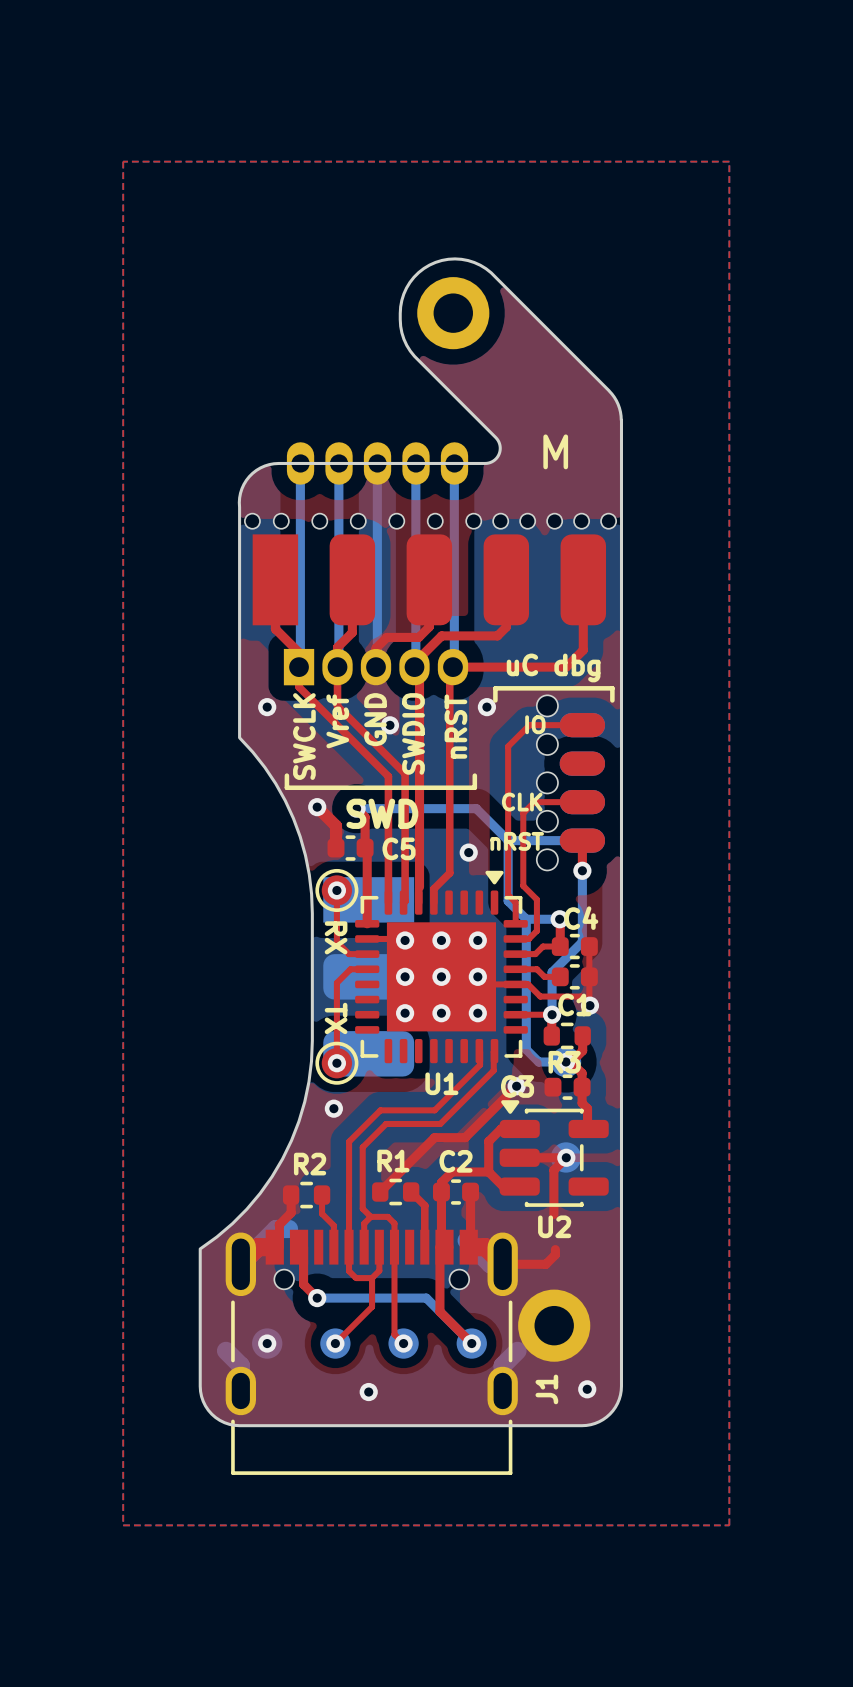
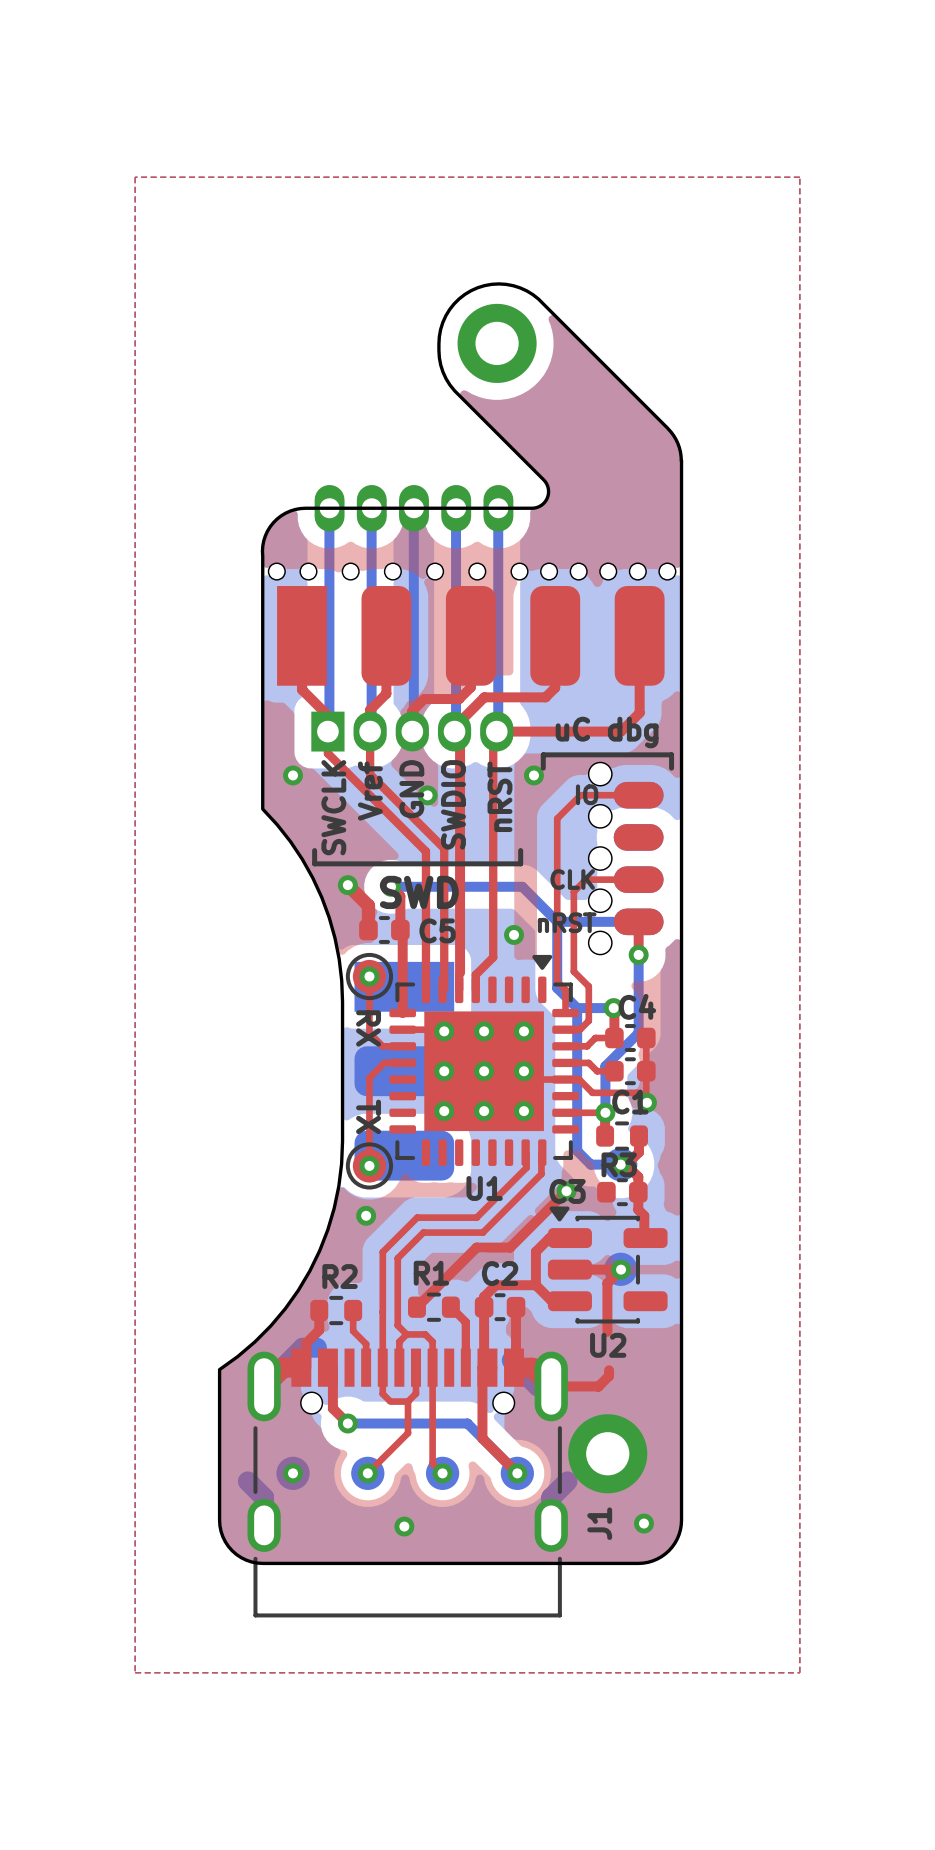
text: M (555, 451) -> none

